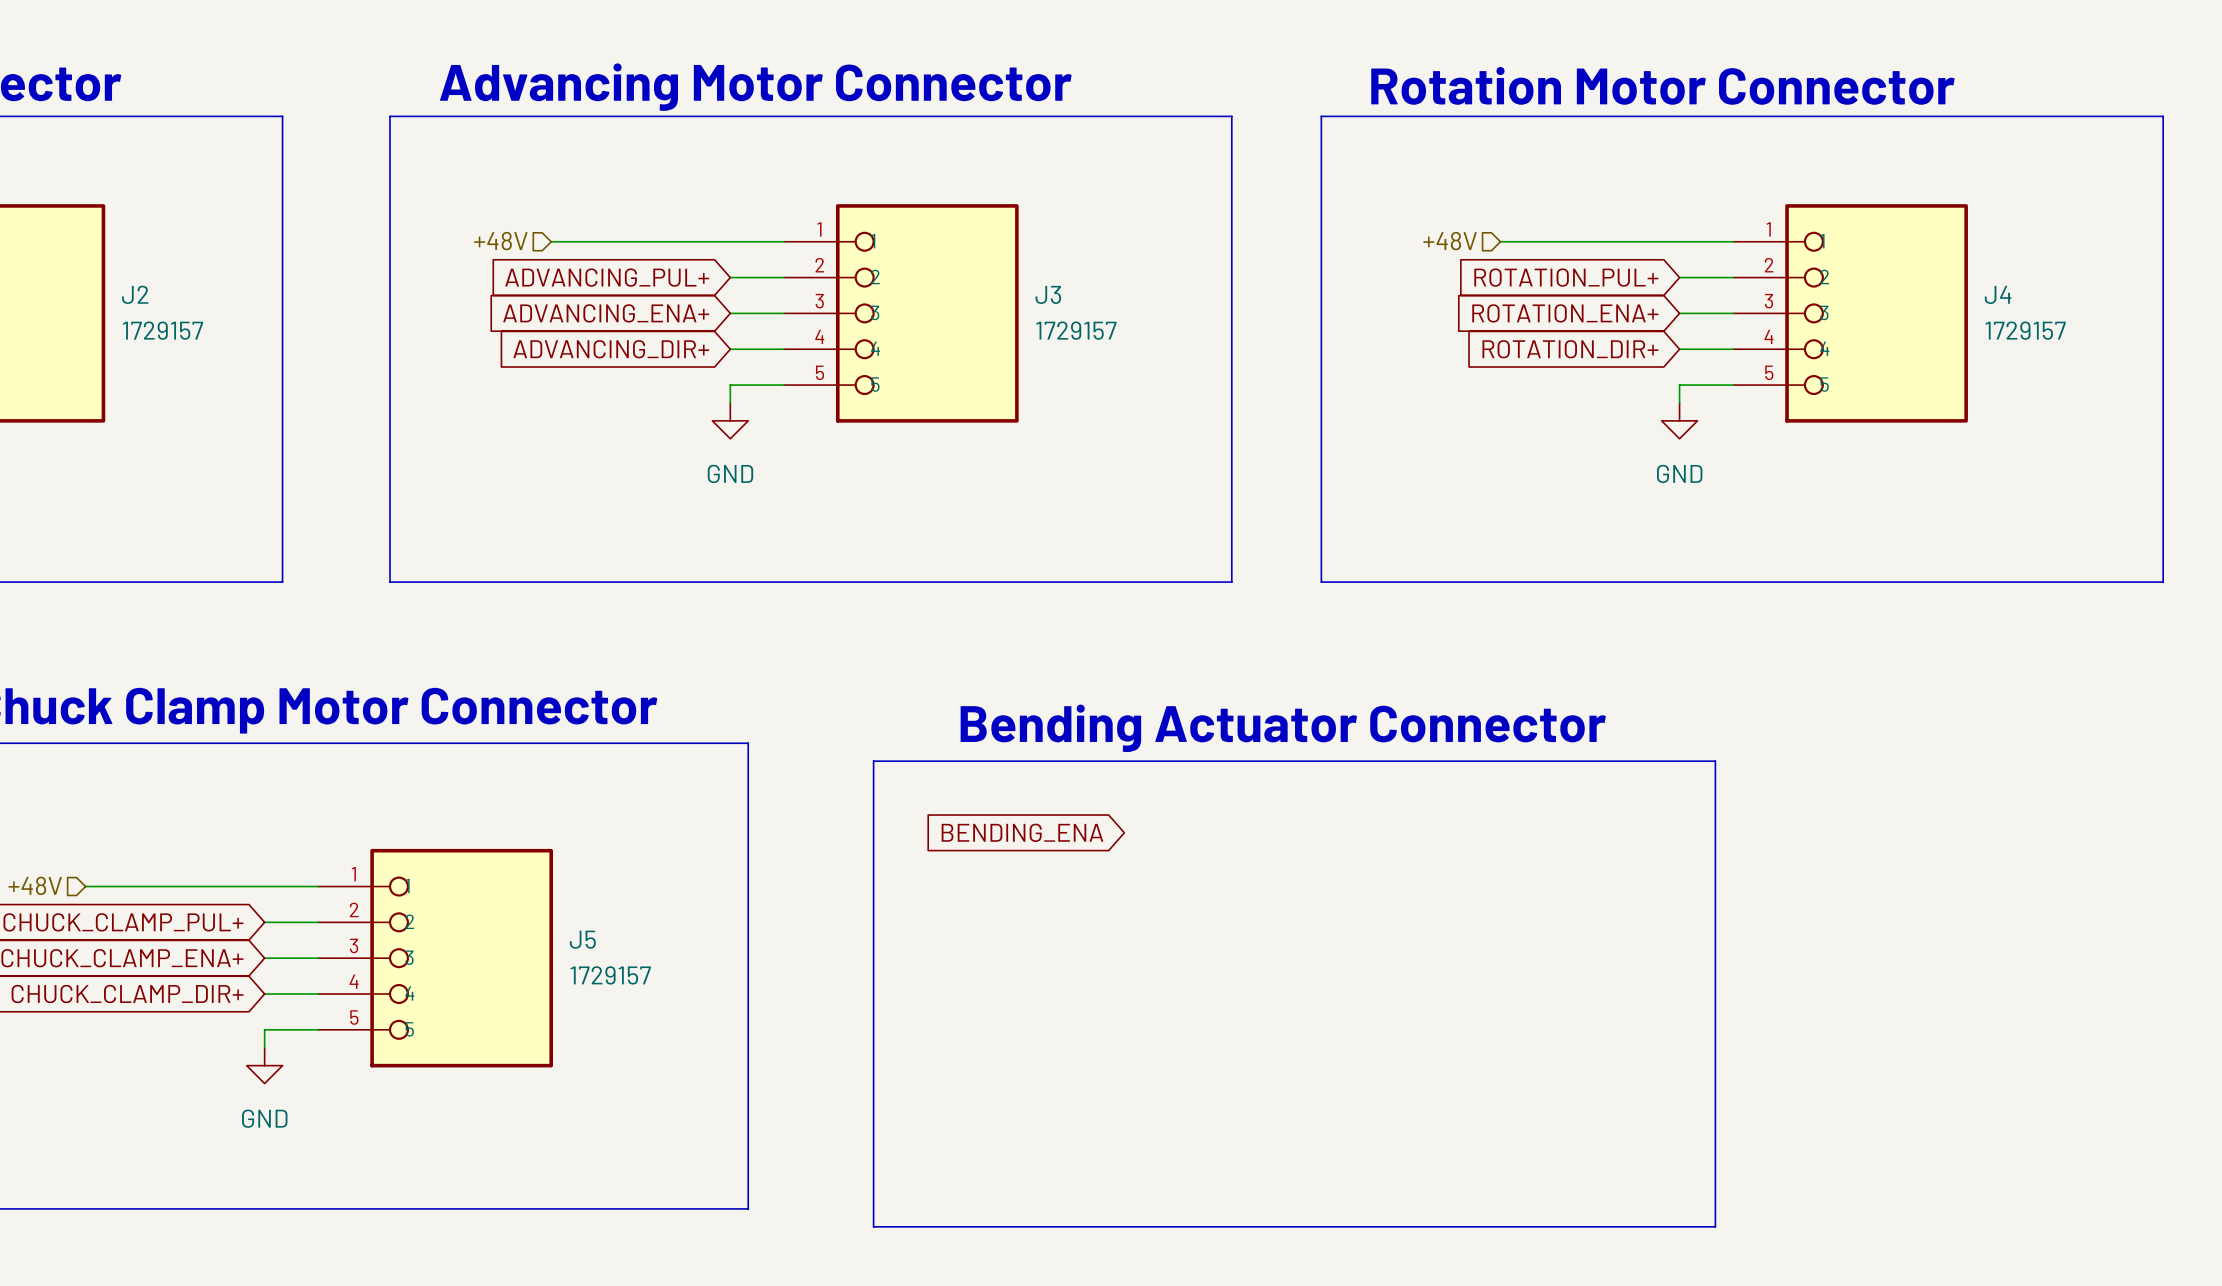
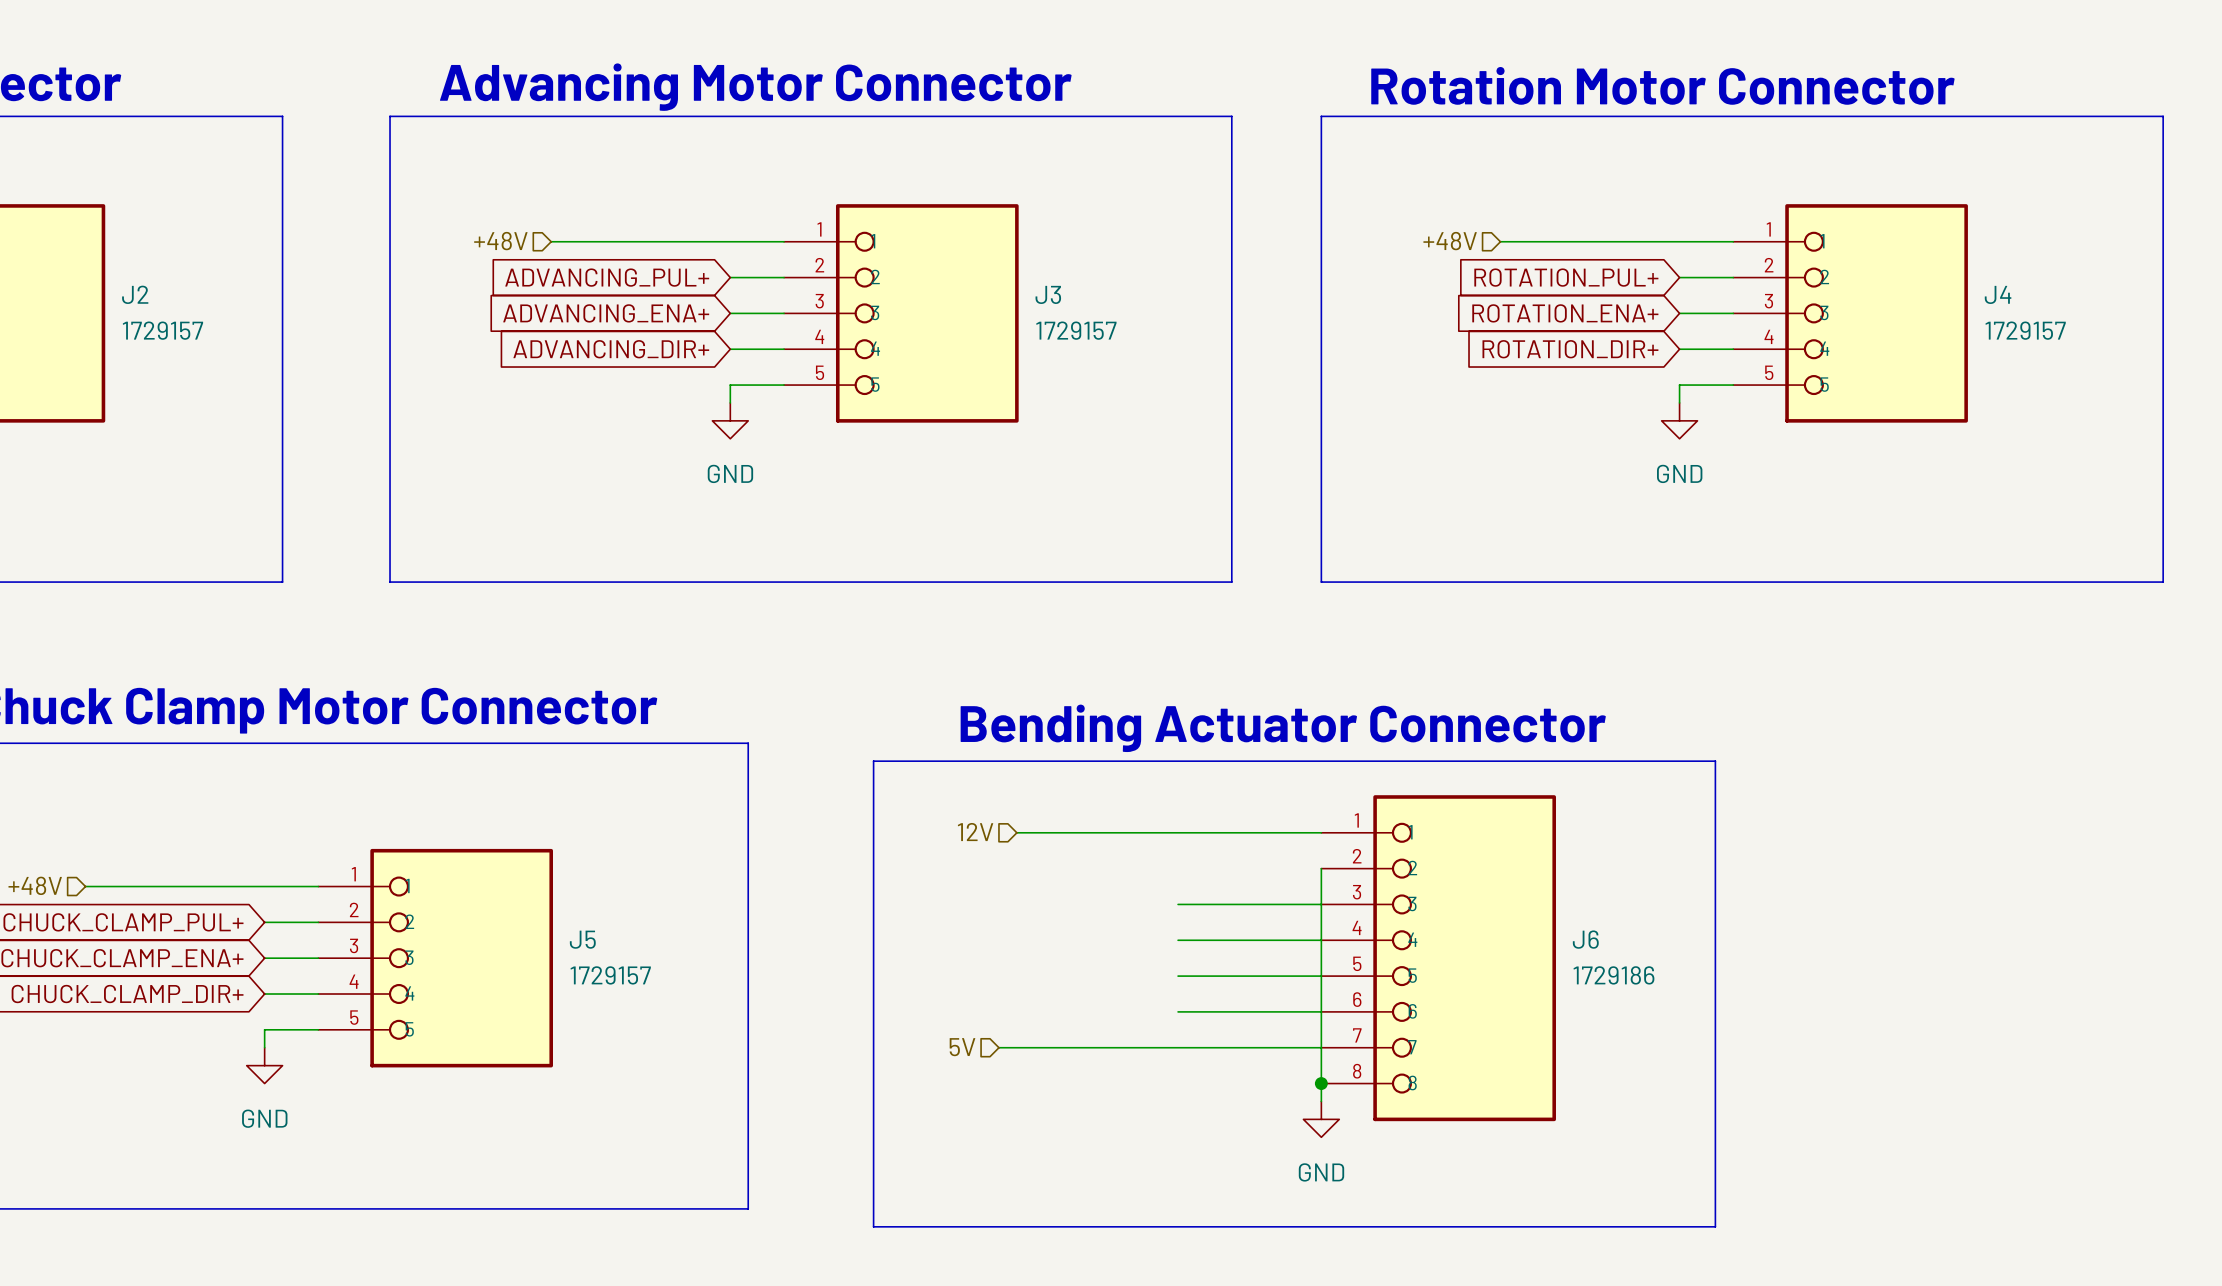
hierarchical label: none -> 12V (975, 832)
wire: none -> (1016, 832) (1321, 832)
global label: BENDING_ENA (1022, 832) -> none
wire: none -> (1321, 868) (1321, 1101)
wire: none -> (1178, 904) (1321, 904)
wire: none -> (1178, 940) (1321, 940)
J6: none -> 1729186 (1438, 958)
wire: none -> (1178, 976) (1321, 976)
wire: none -> (1178, 1011) (1321, 1011)
hierarchical label: none -> 5V (962, 1047)
wire: none -> (998, 1047) (1321, 1047)
junction: none -> (1321, 1083)
power symbol: none -> GND (1321, 1119)

